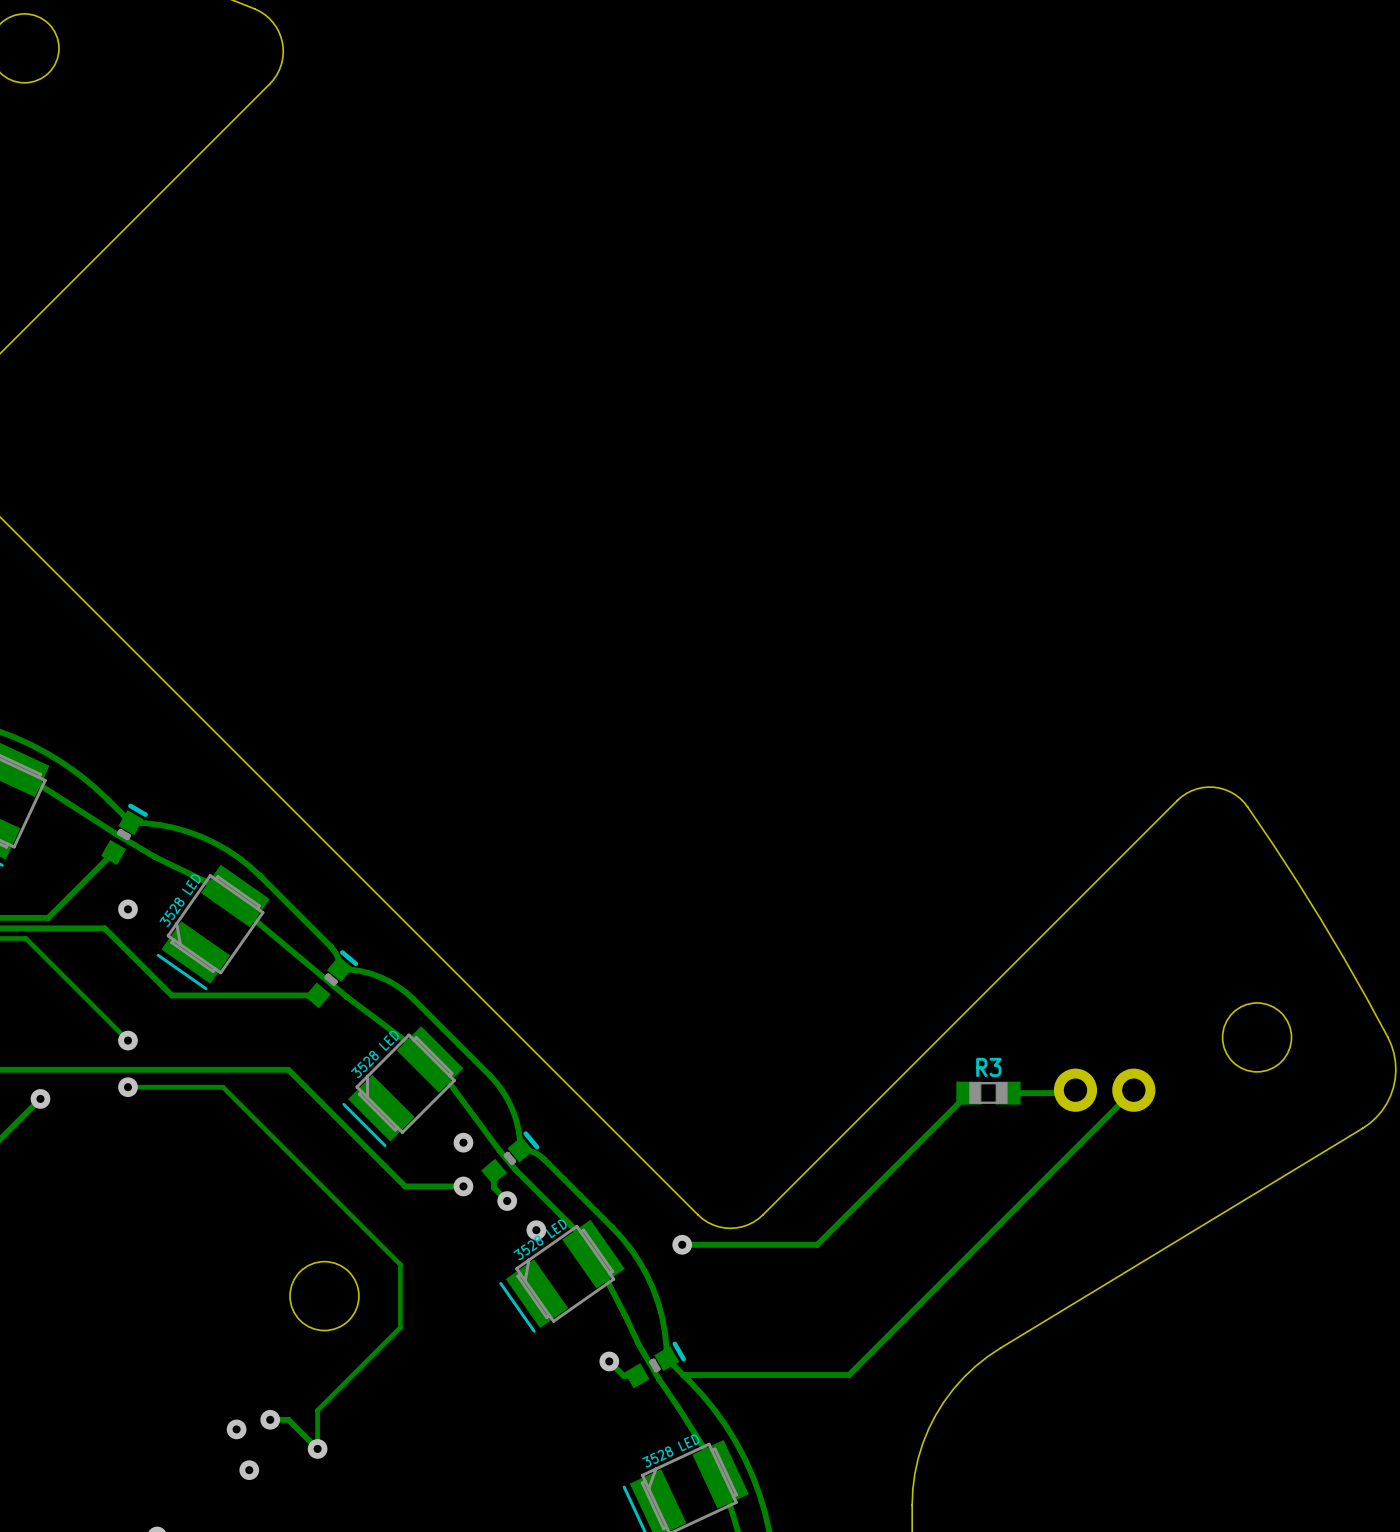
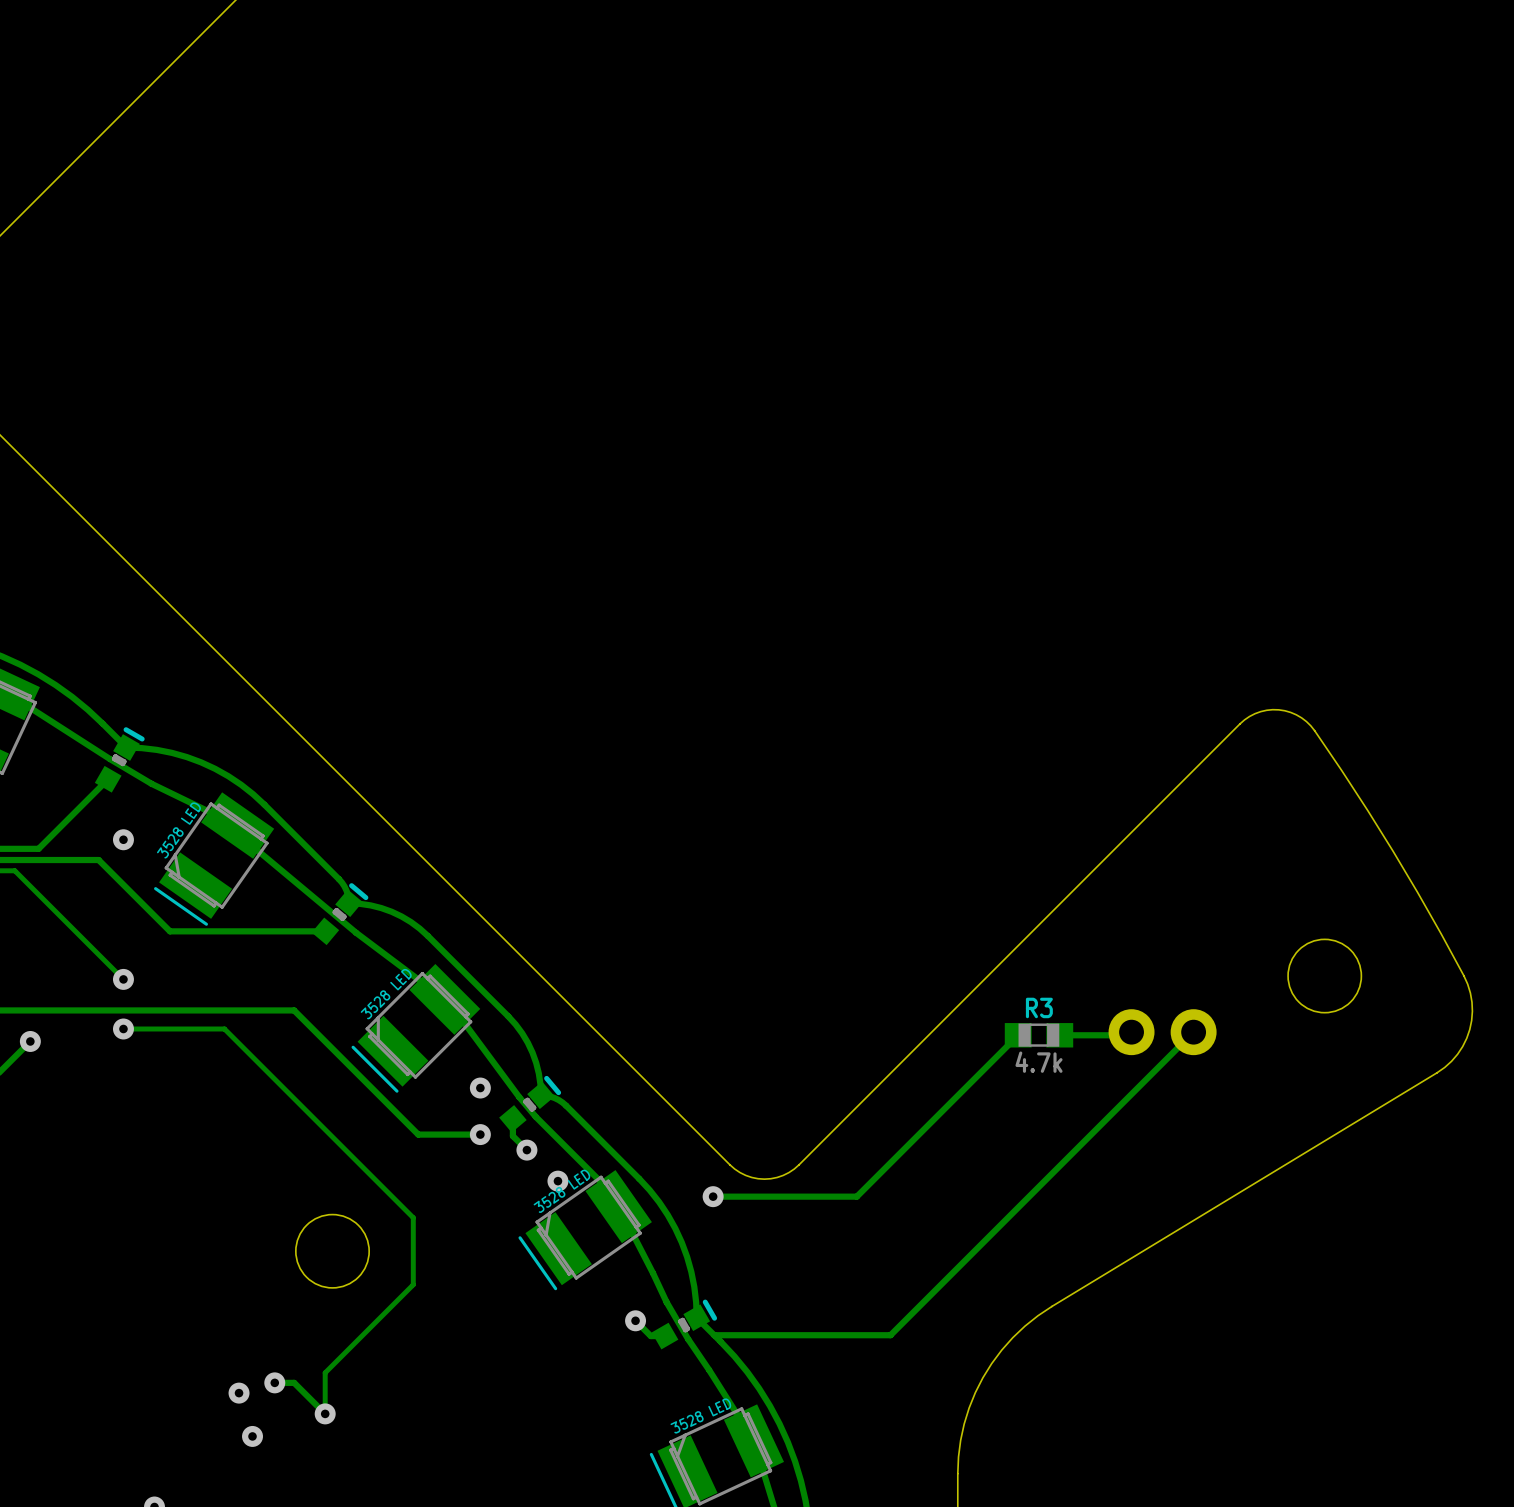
R3 value: none -> 4.7k (1039, 1062)

